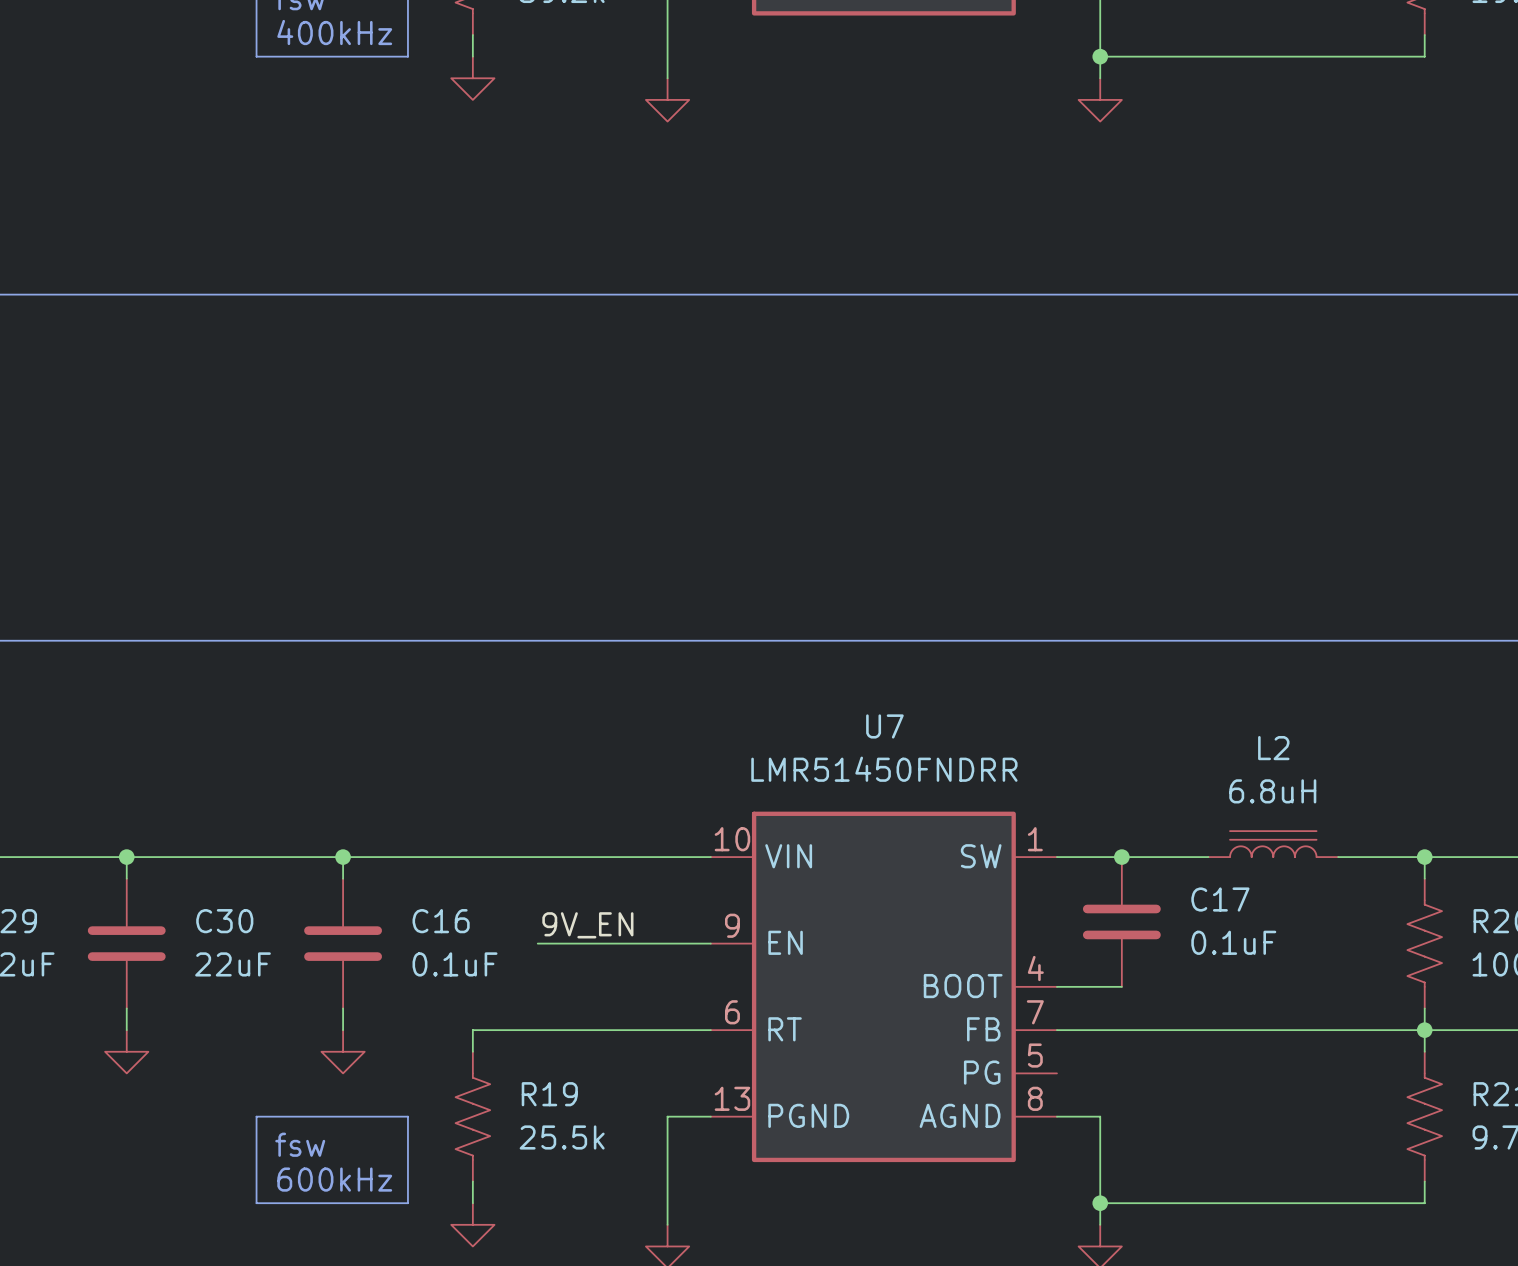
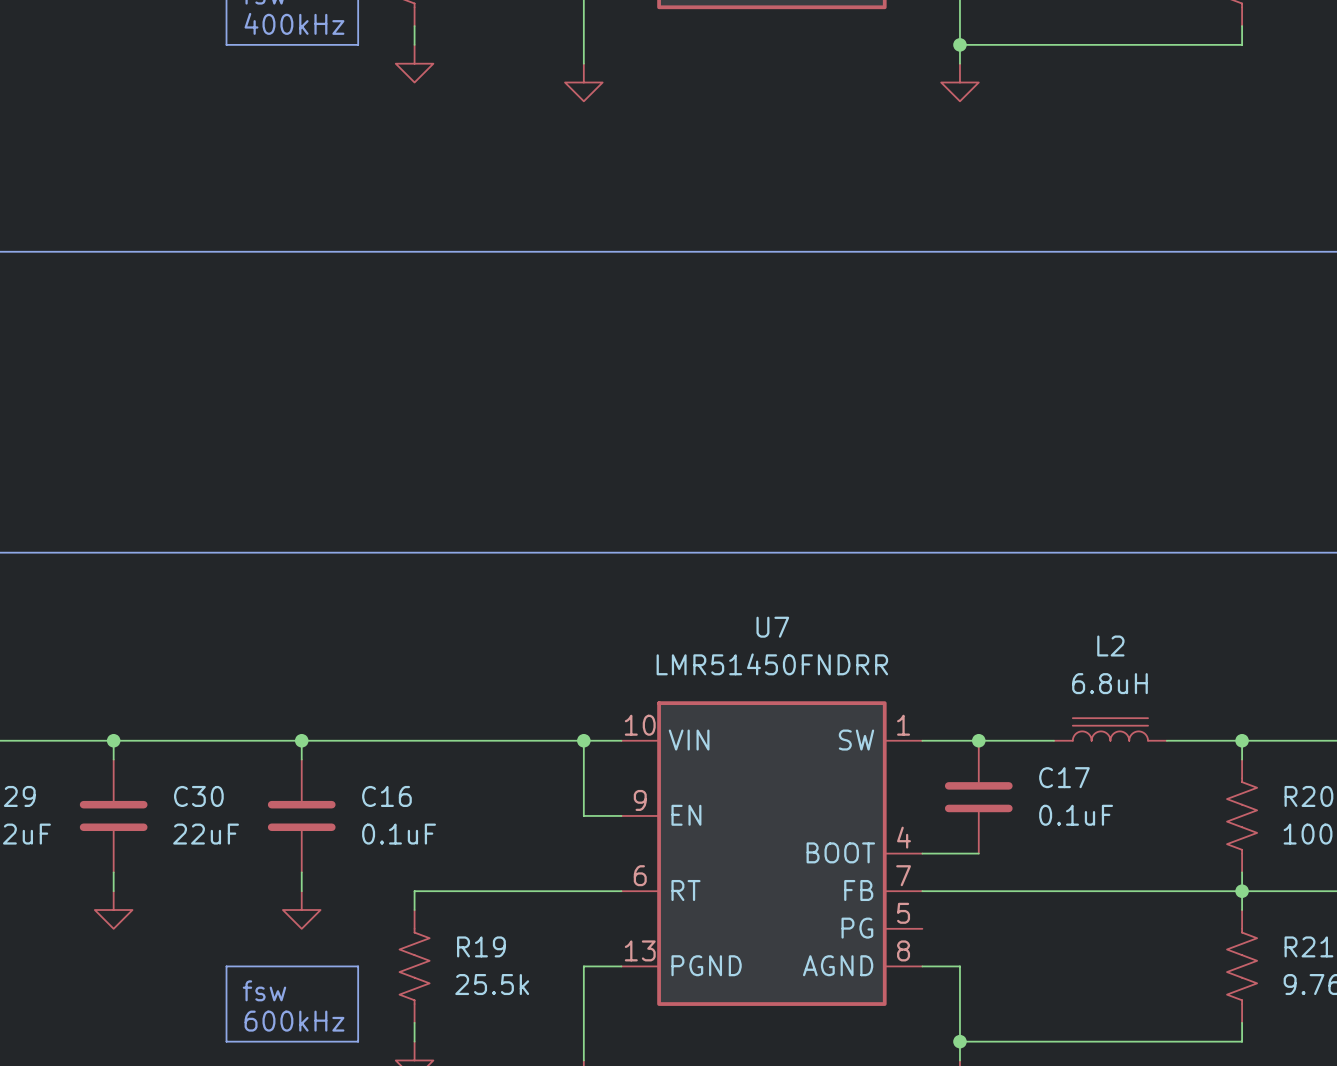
junction: none -> (583, 740)
label: 9V_EN (587, 925) -> none
wire: (537, 943) (667, 943) -> (583, 740) (583, 815)

